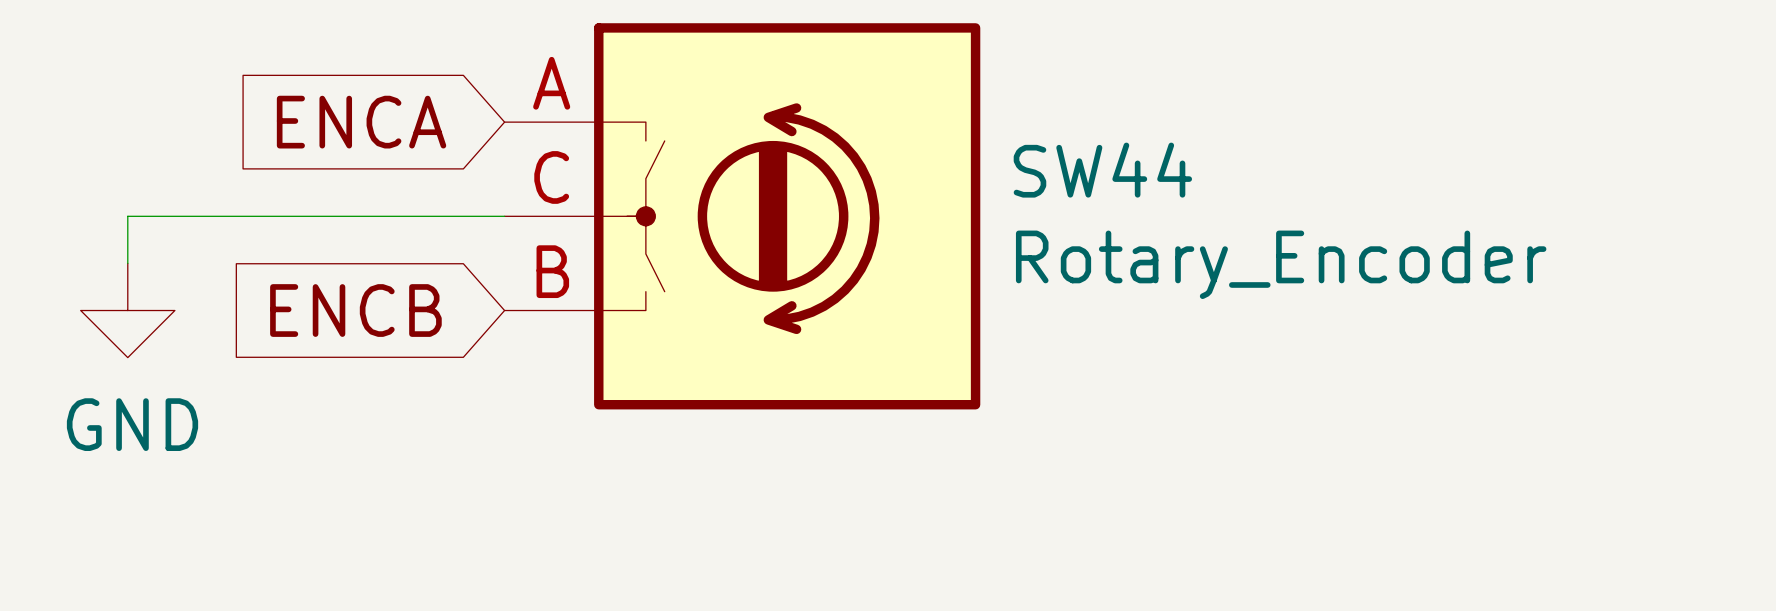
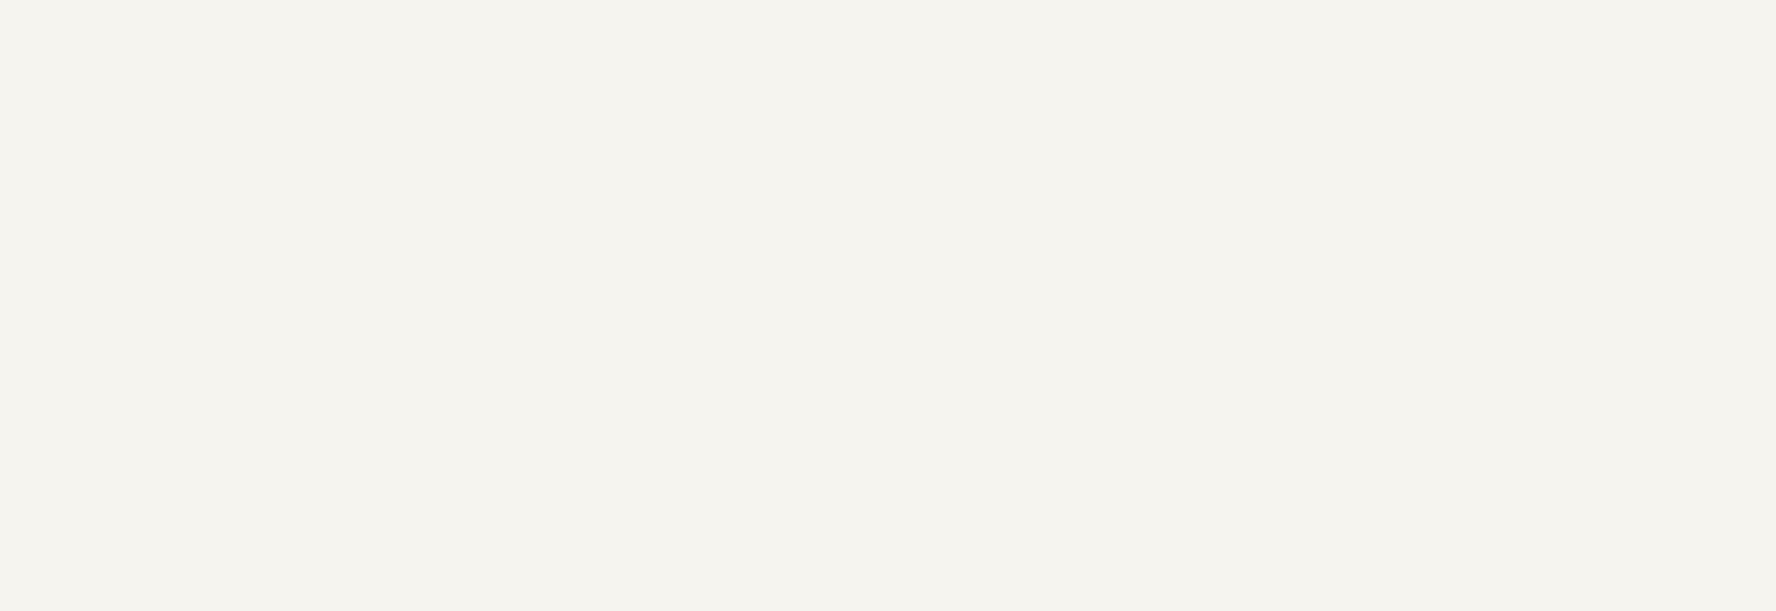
global label: ENCA (361, 122) -> none
wire: (504, 216) (127, 216) (127, 263) -> none
SW44: Rotary_Encoder (742, 216) -> none
power symbol: GND (127, 310) -> none
global label: ENCB (355, 310) -> none

